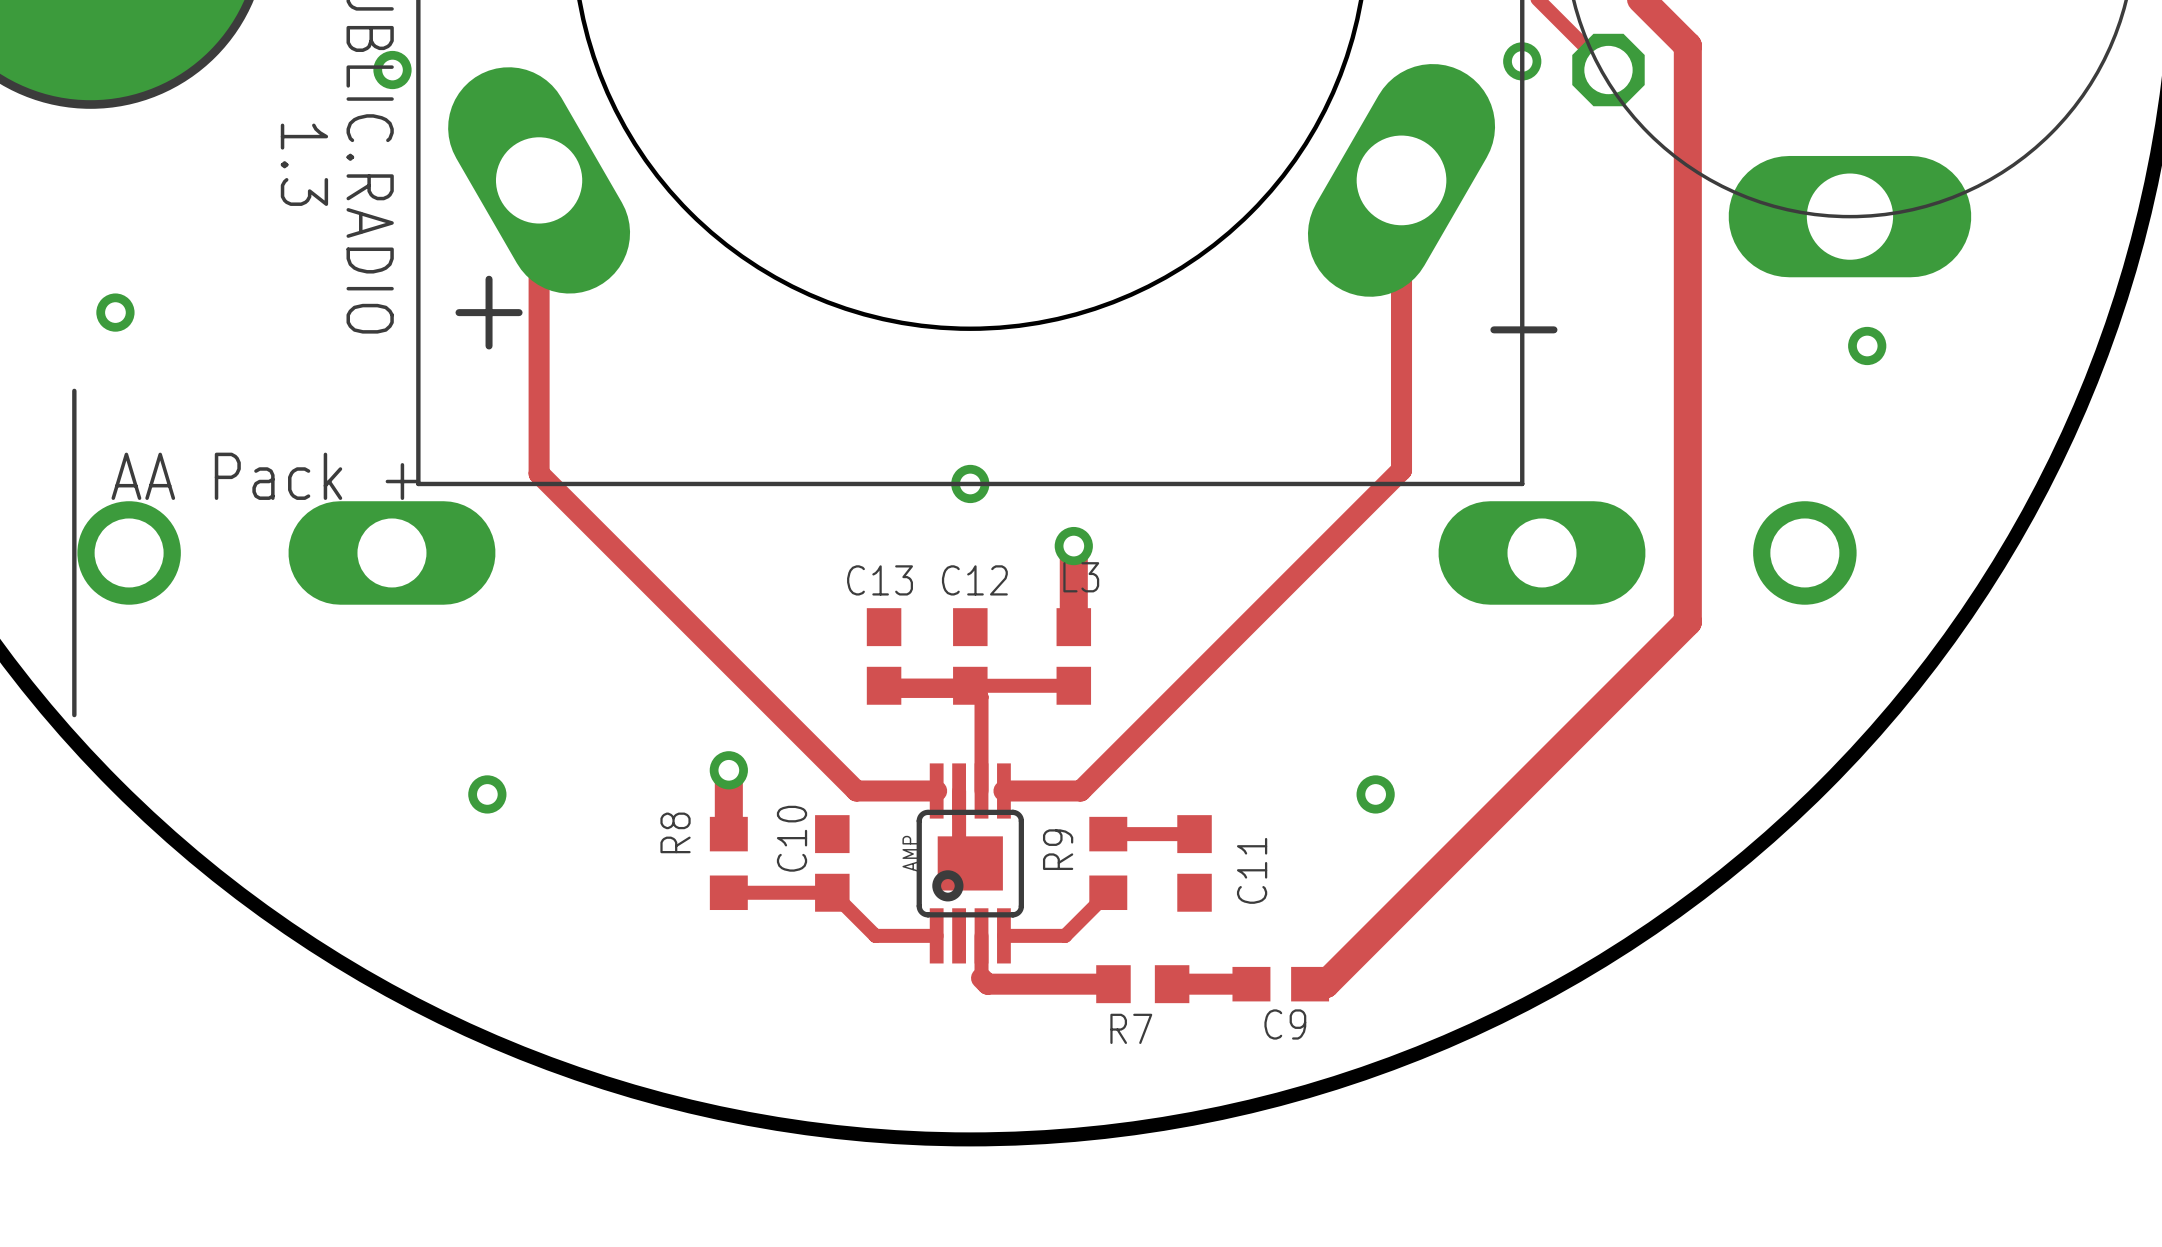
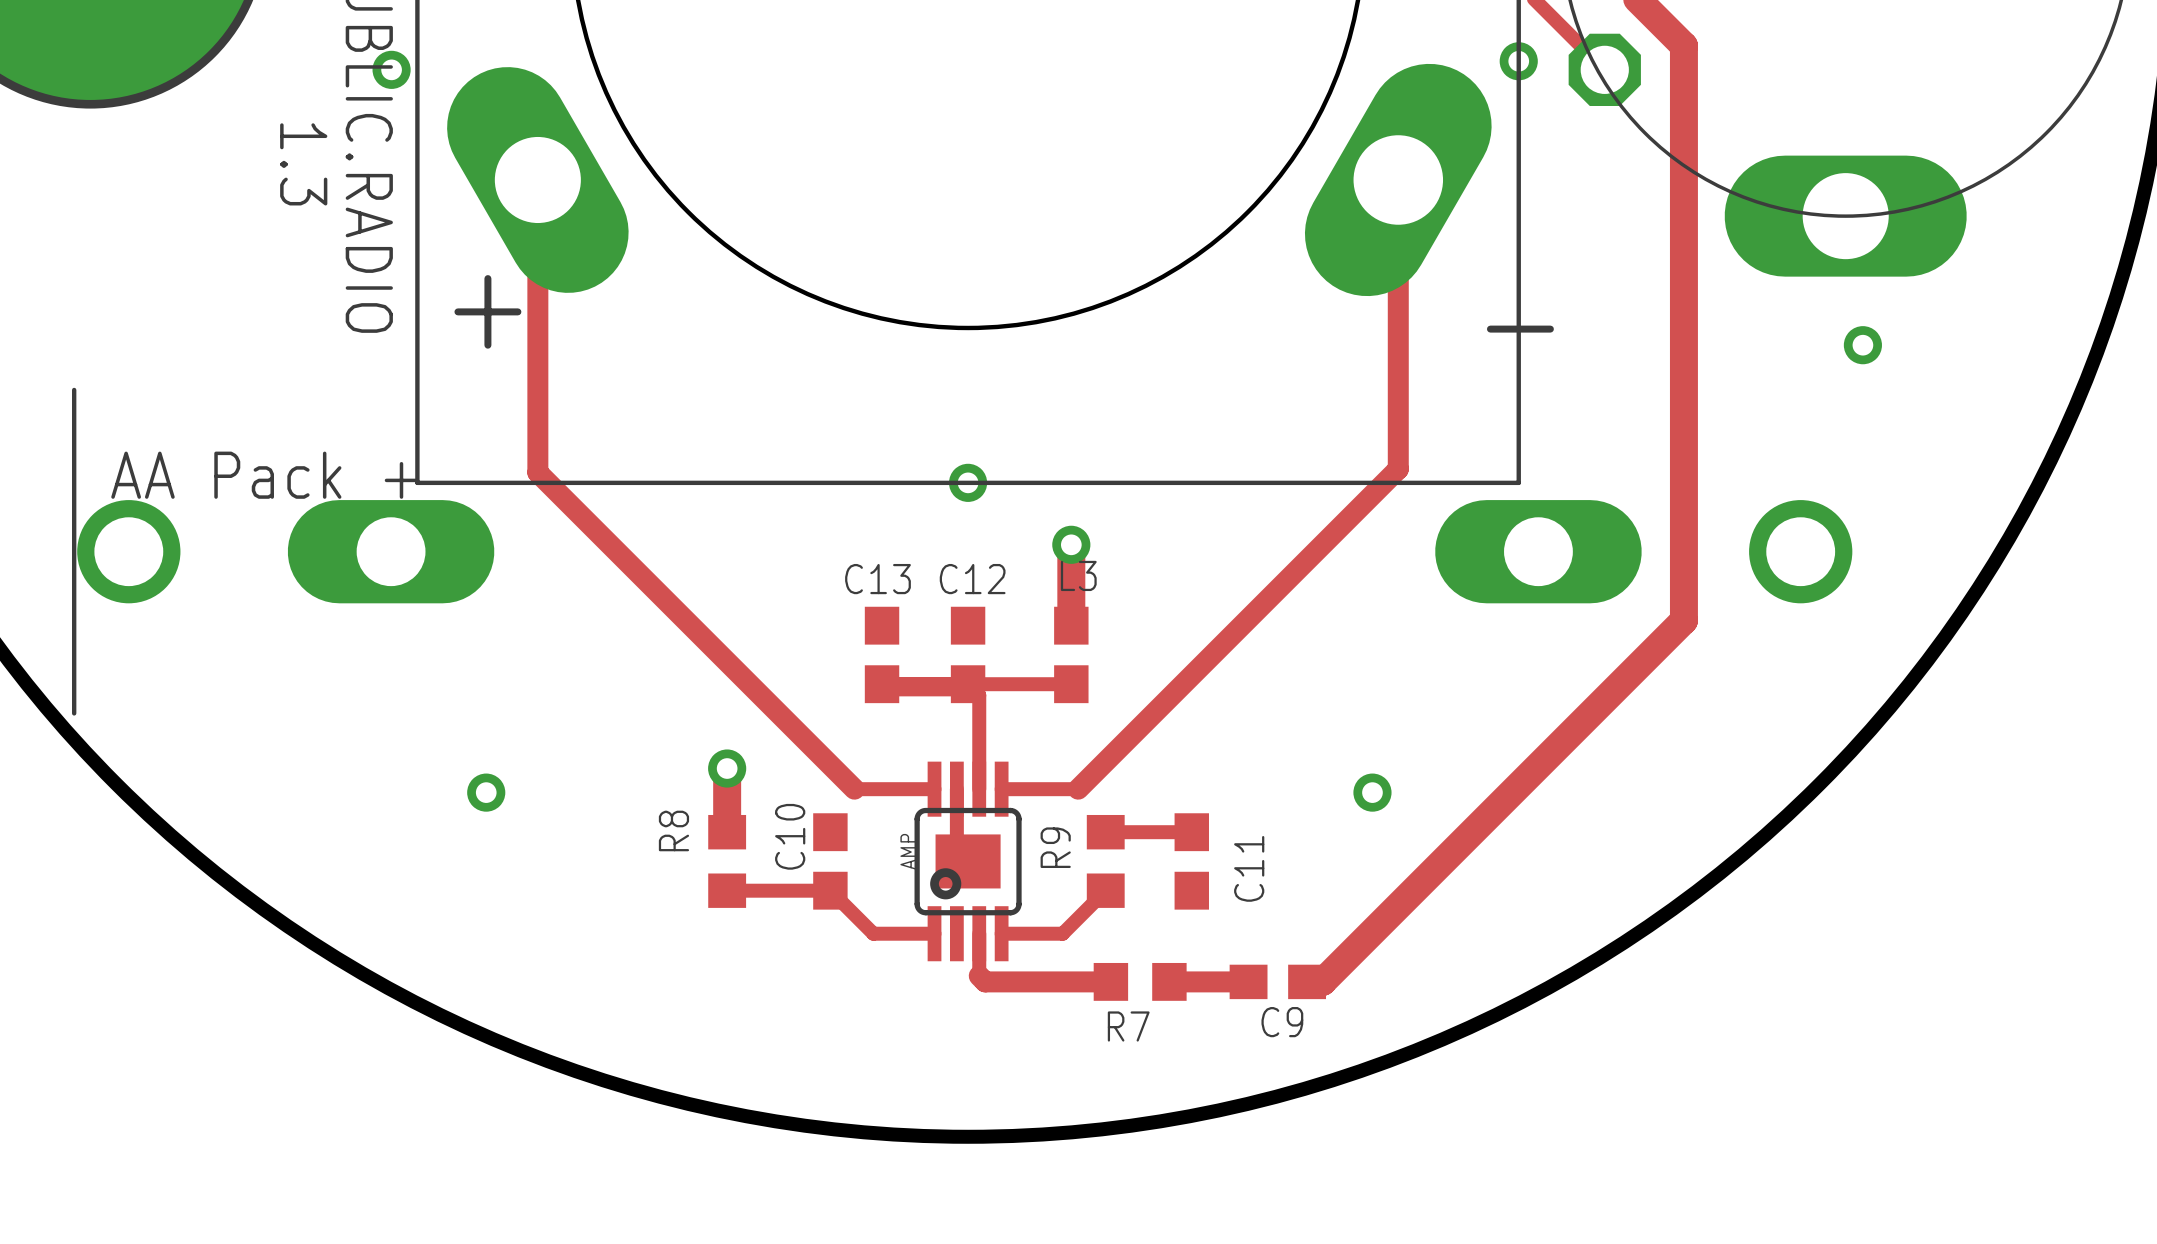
via: (115, 312) -> none
track width: thick (856, 790) (936, 790) -> thin (854, 789) (934, 789)
track width: thick (1003, 790) (1080, 790) -> thin (1001, 789) (1078, 789)

